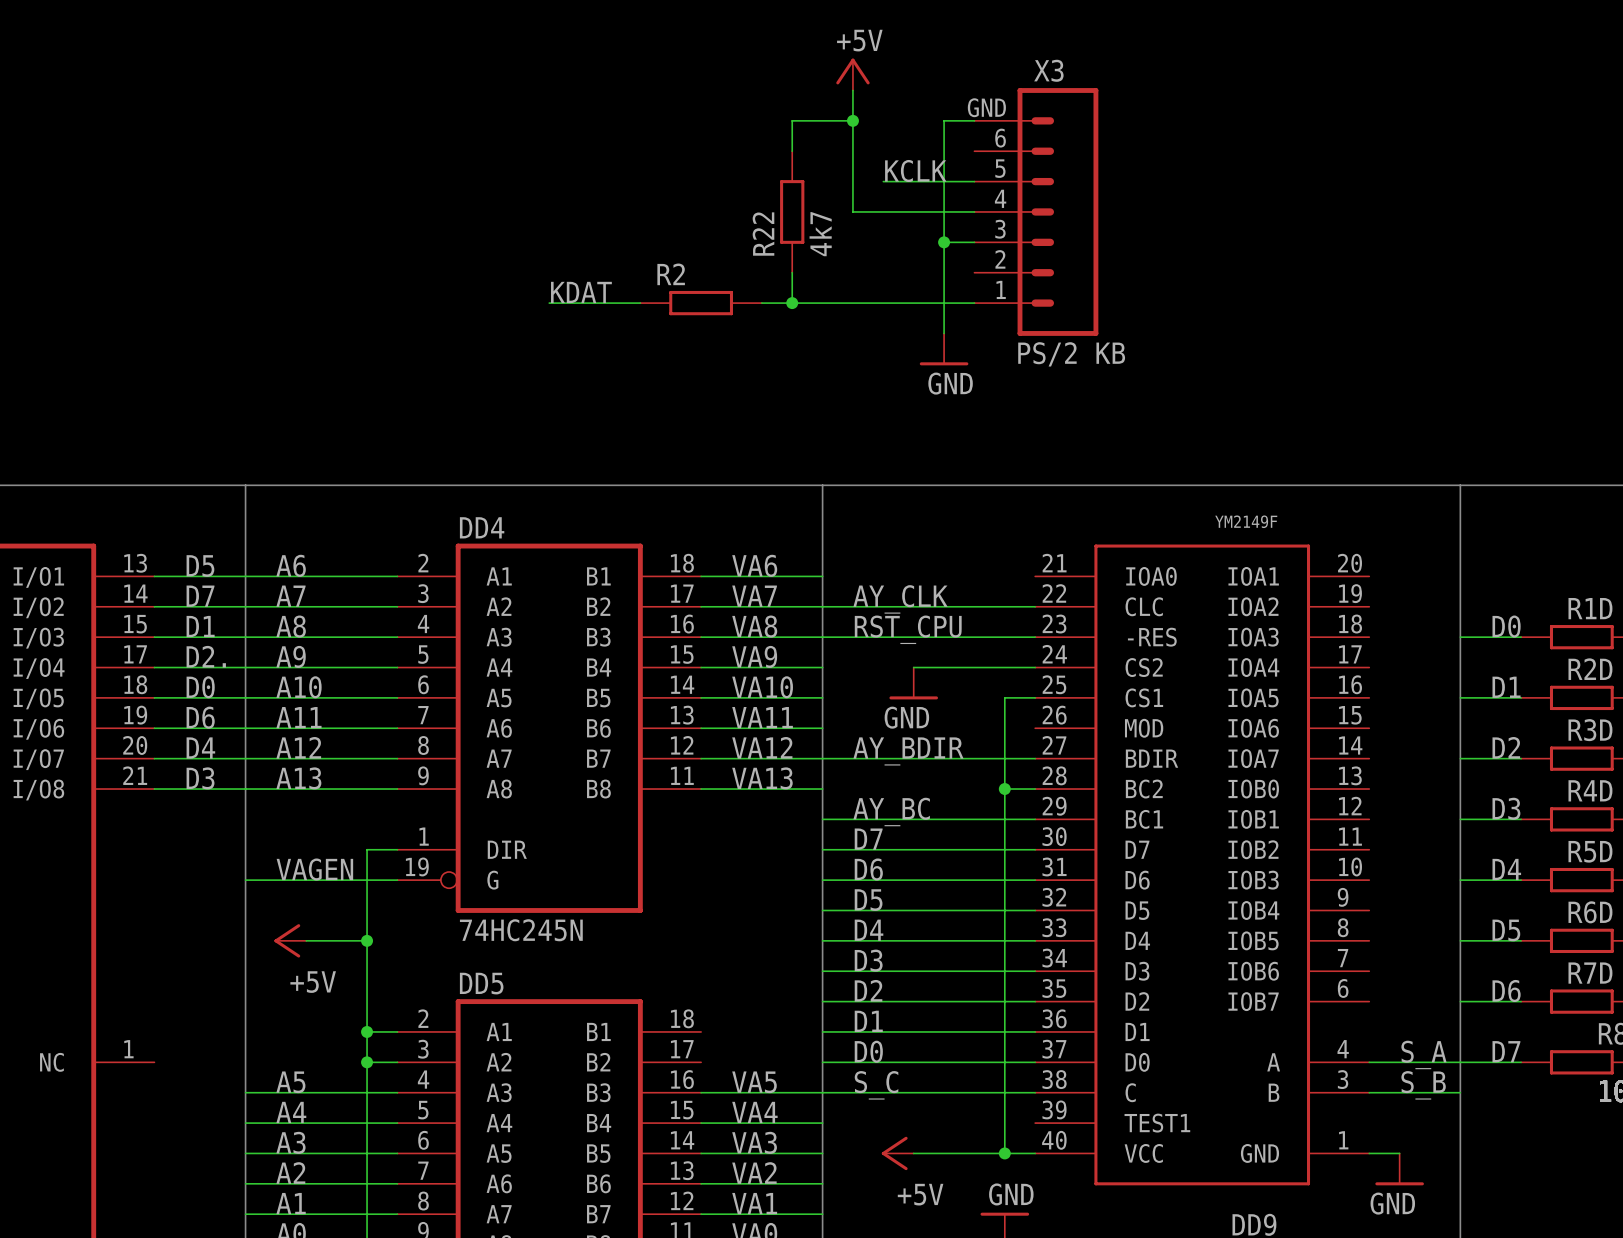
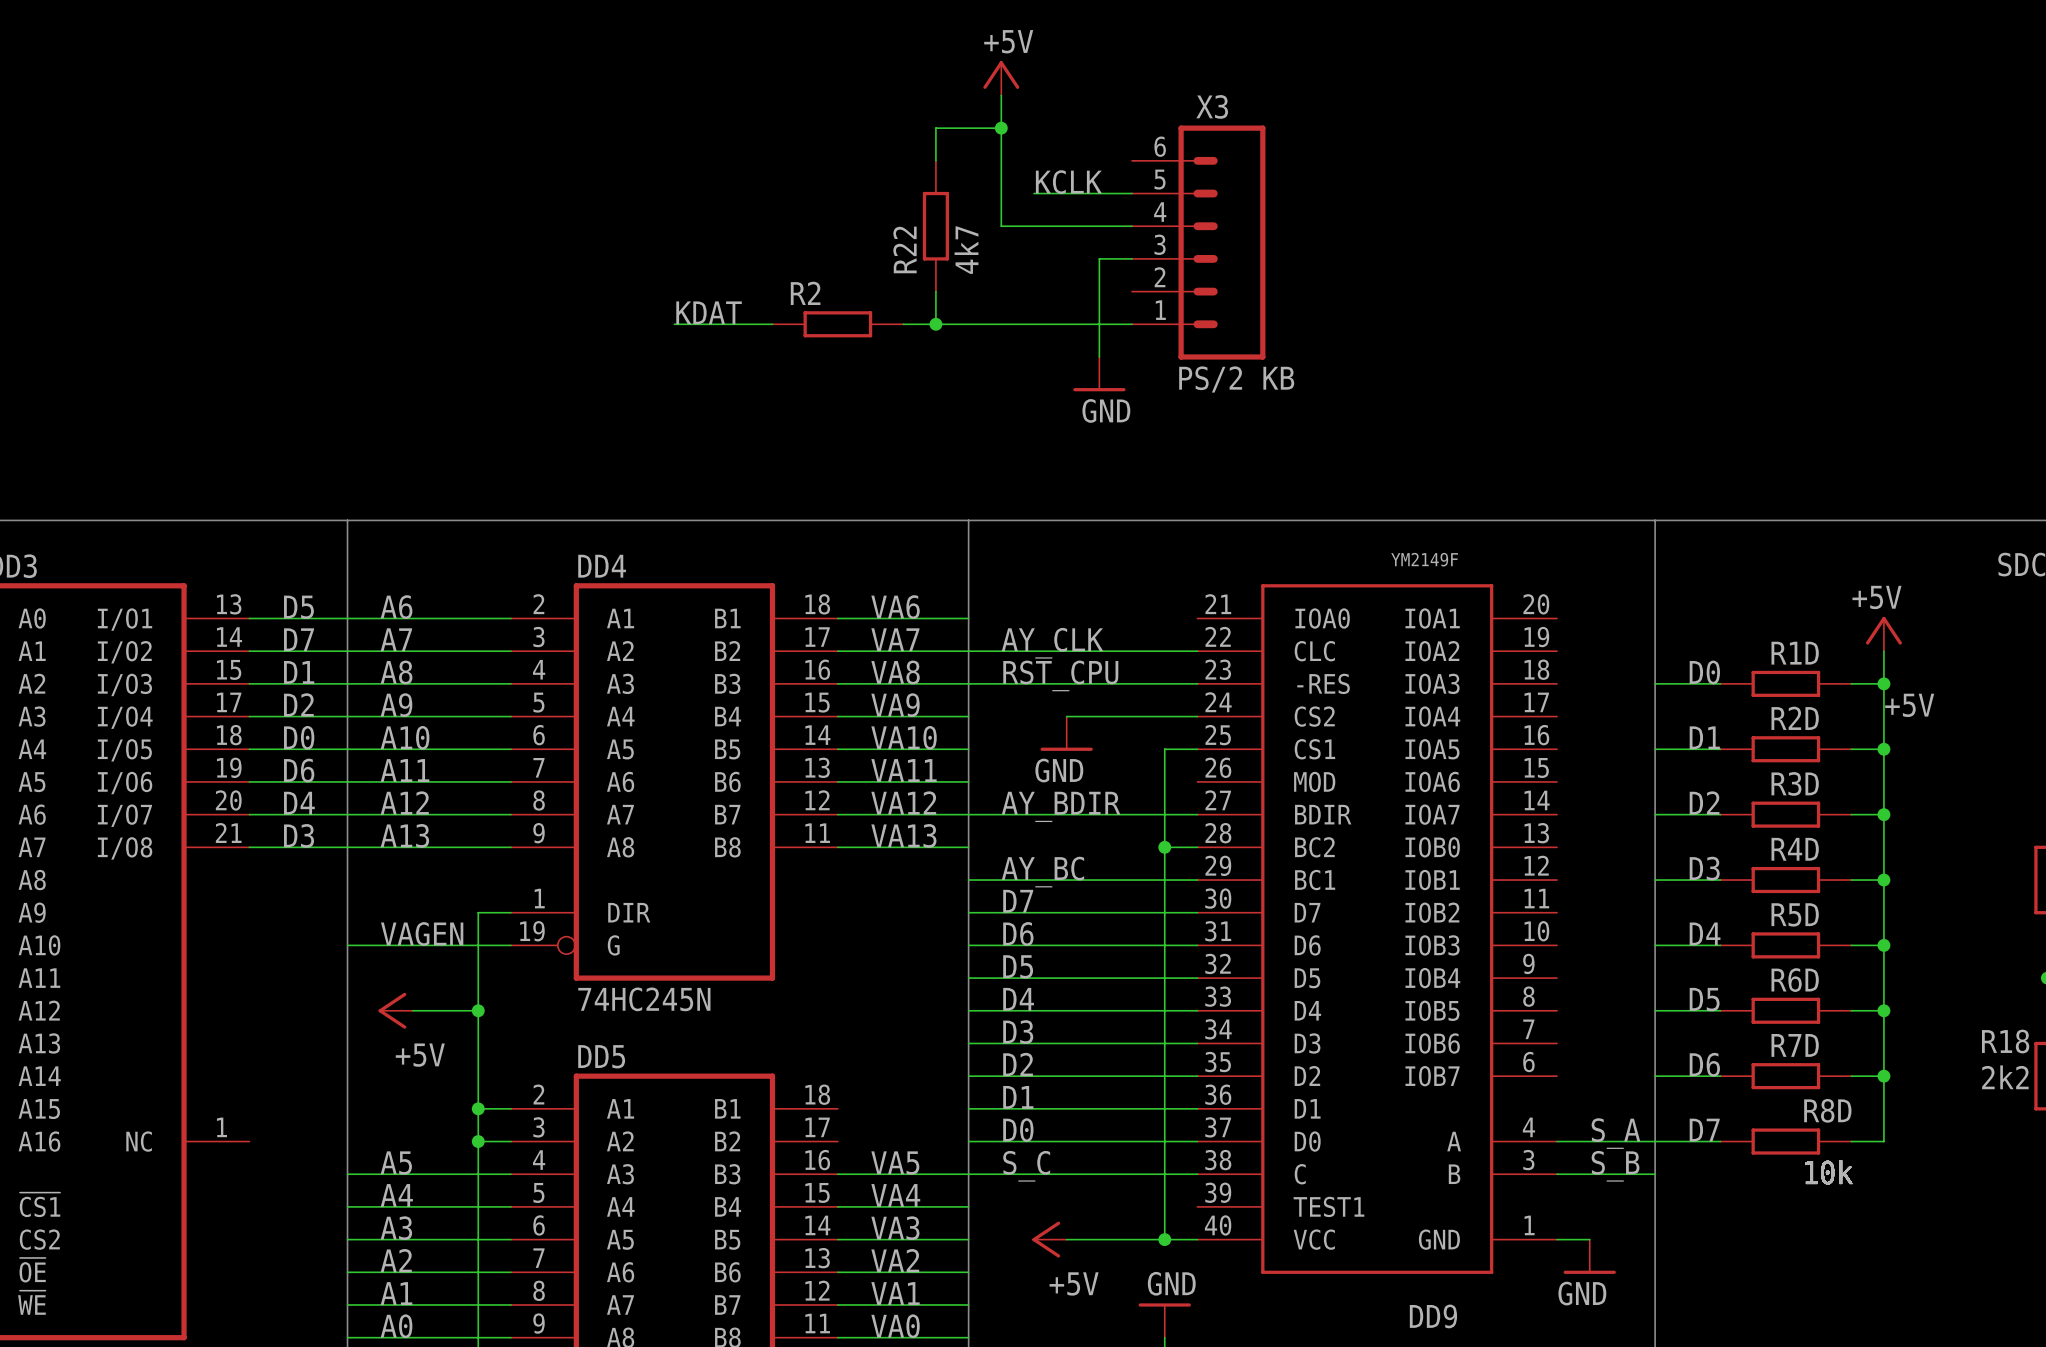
X3 symbol: [974, 88, 1099, 336] -> [1132, 125, 1266, 360]
wire: (974, 120) (944, 120) (944, 242) -> none
junction: (944, 242) -> none
label: D2. (206, 656) -> D2 (298, 704)

